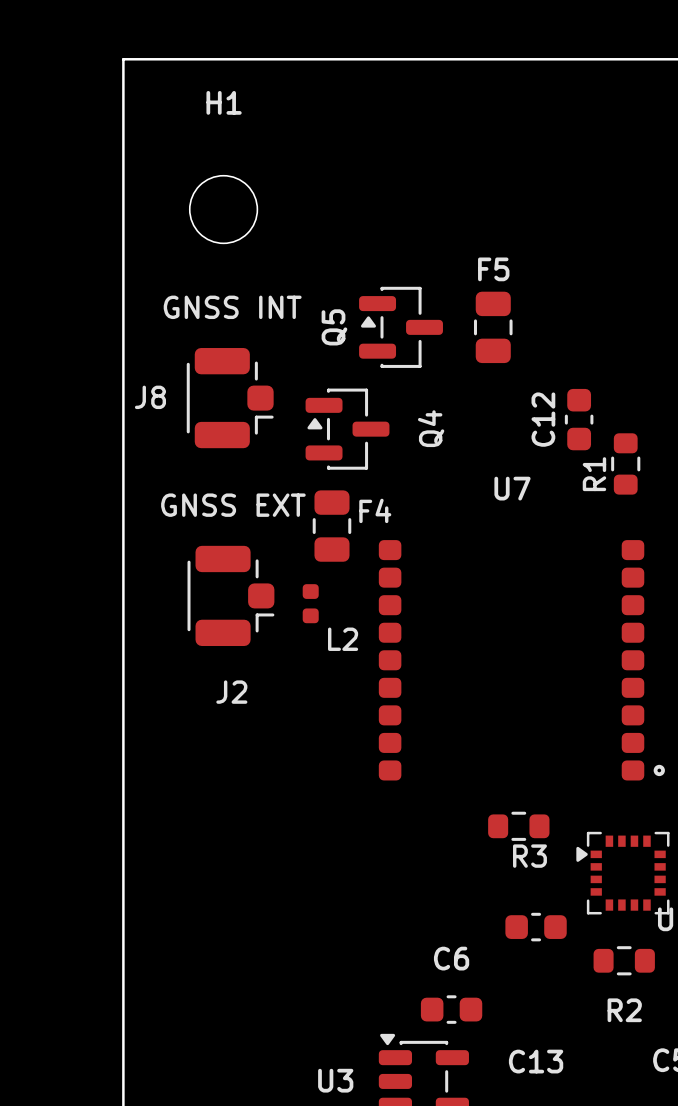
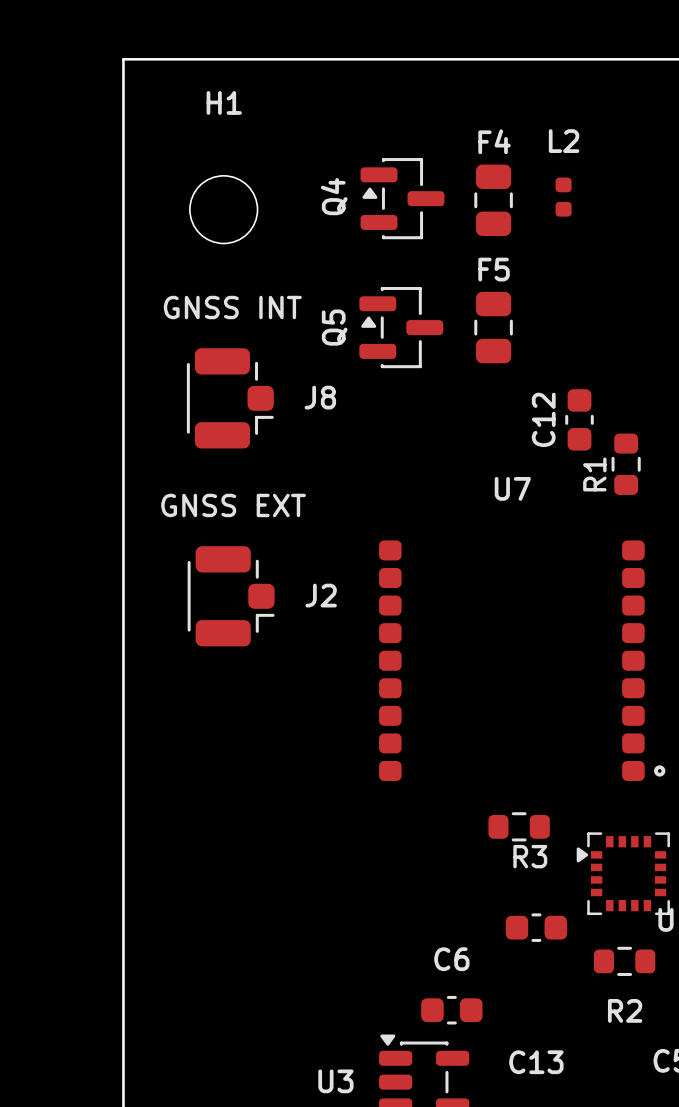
J8 name position: J8 (150, 397) -> J8 (320, 397)
Q4 name position: Q4 (431, 428) -> Q4 (334, 196)
Q4 position: (347, 429) -> (402, 198)
F4 name position: F4 (375, 510) -> F4 (494, 141)
F4 position: (331, 526) -> (493, 200)
L2 position: (310, 603) -> (563, 197)
L2 name position: L2 (343, 639) -> L2 (564, 141)
J2 name position: J2 (231, 692) -> J2 (321, 595)

